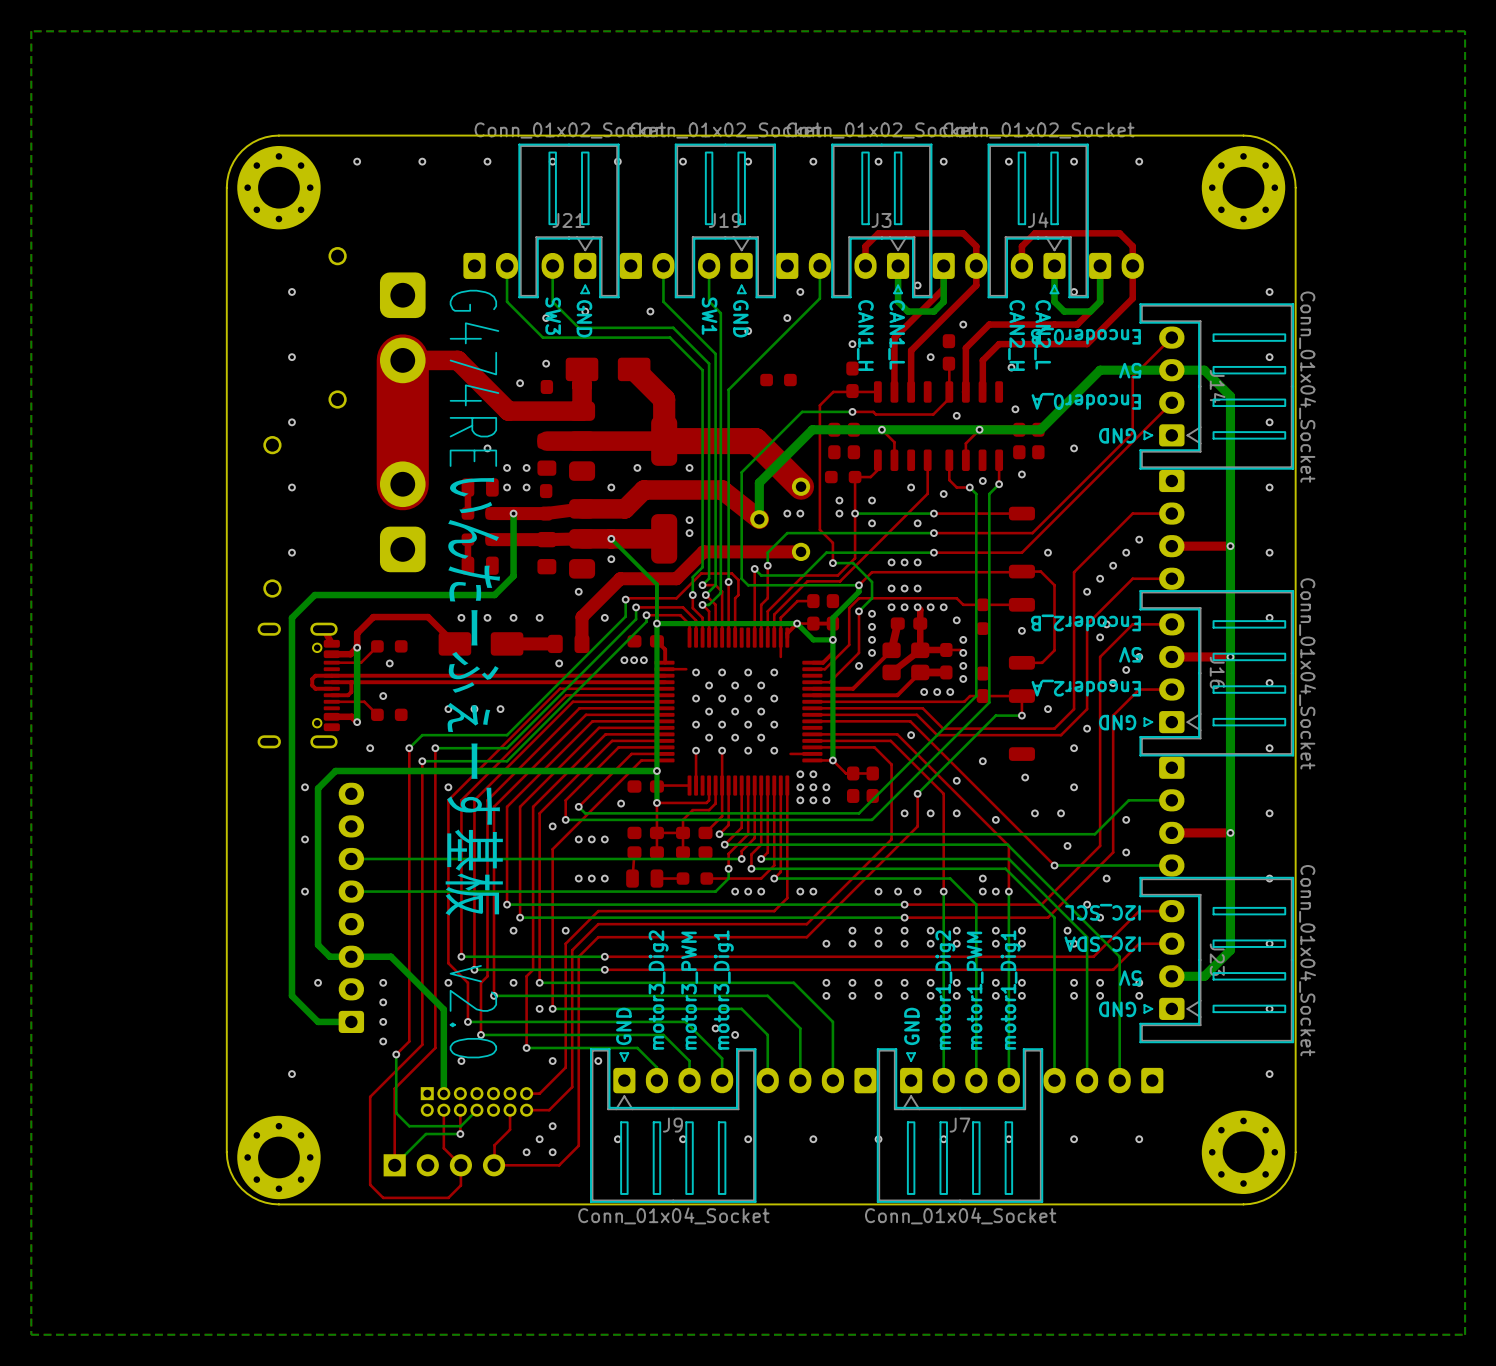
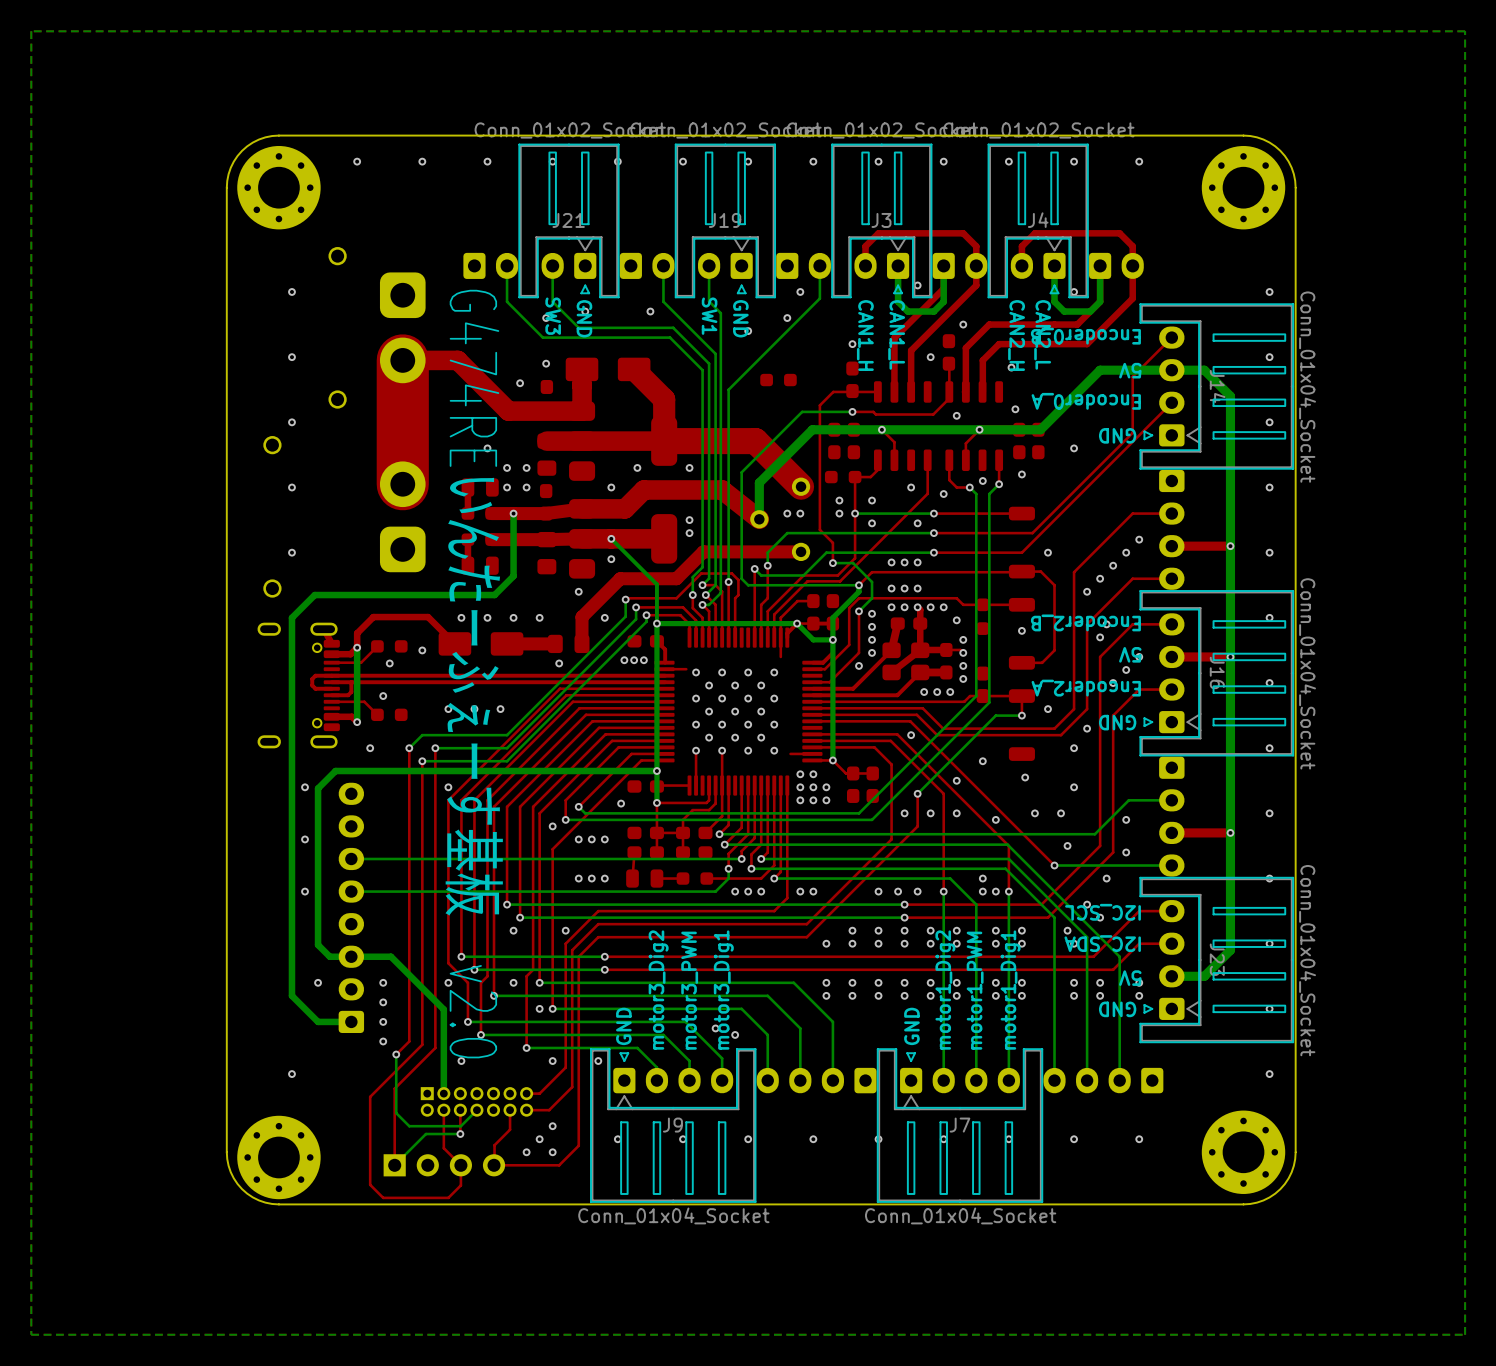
via: none -> (422, 650)

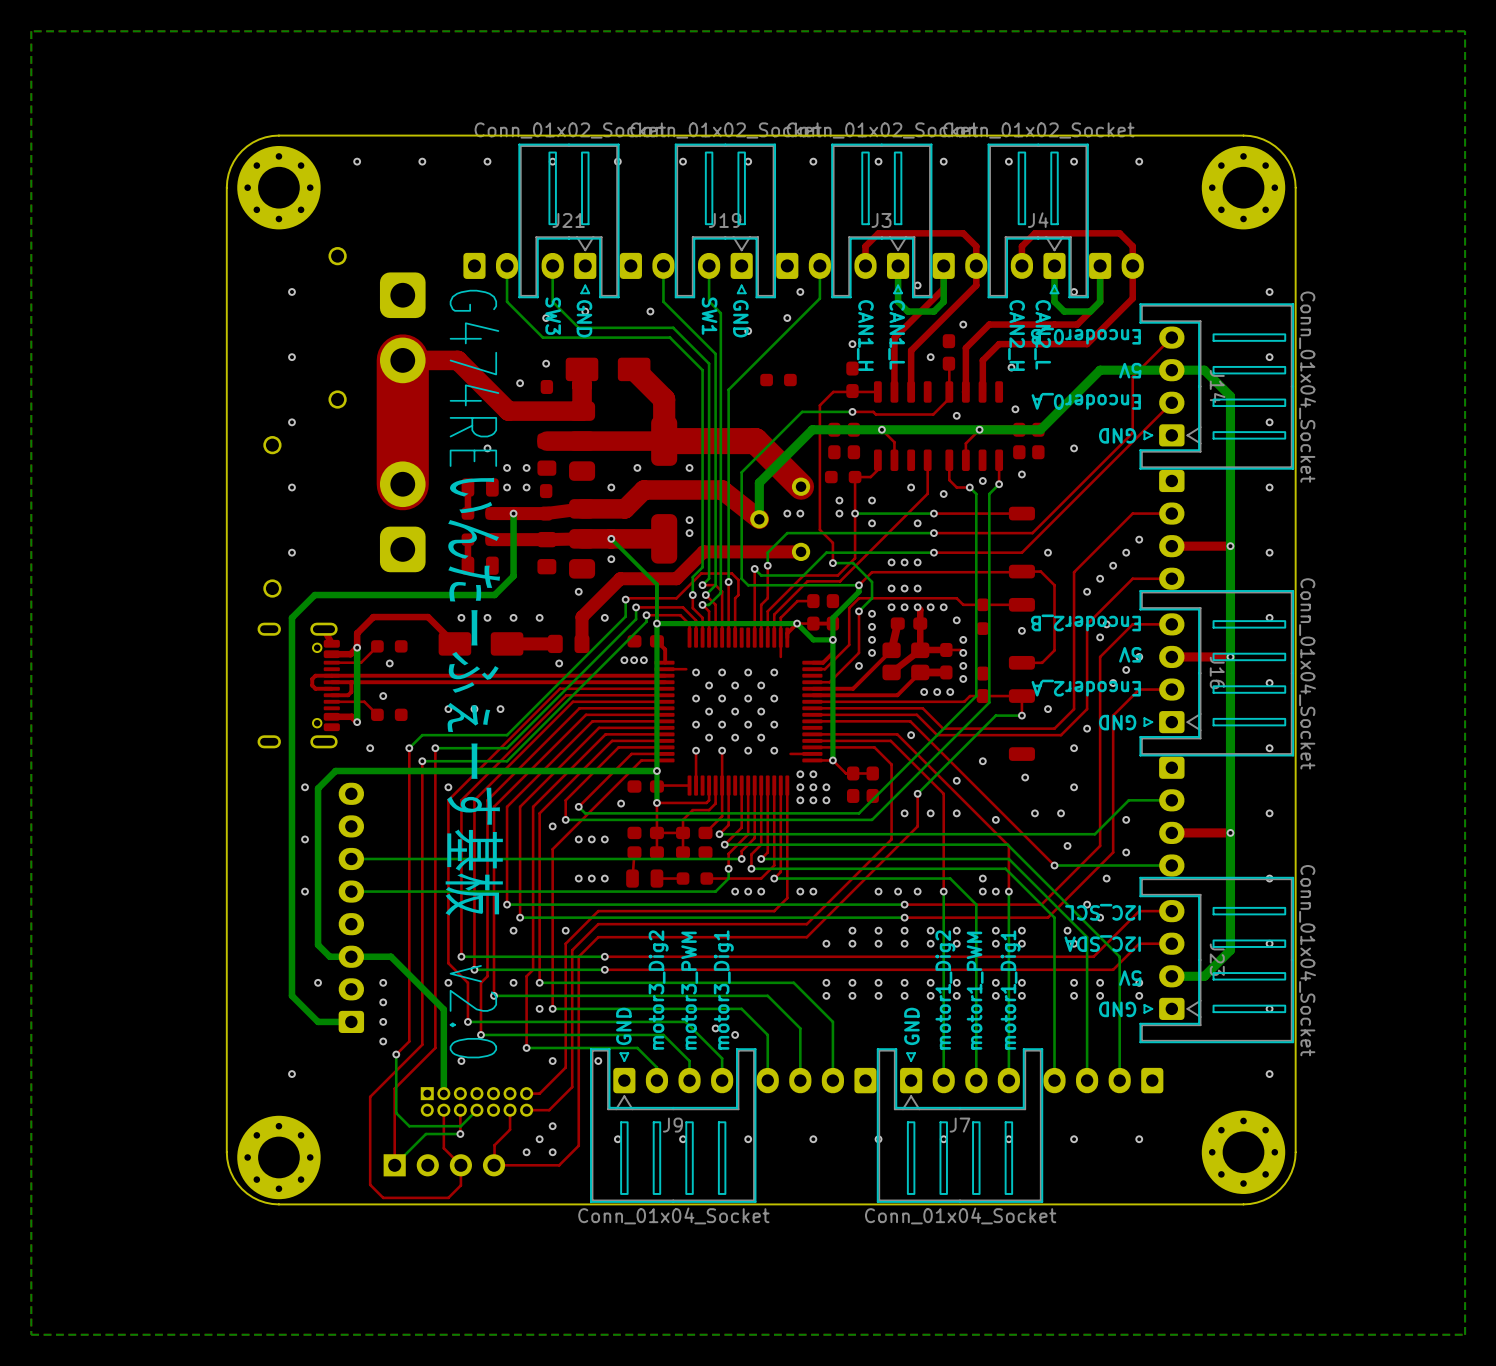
via: (422, 650) -> none

